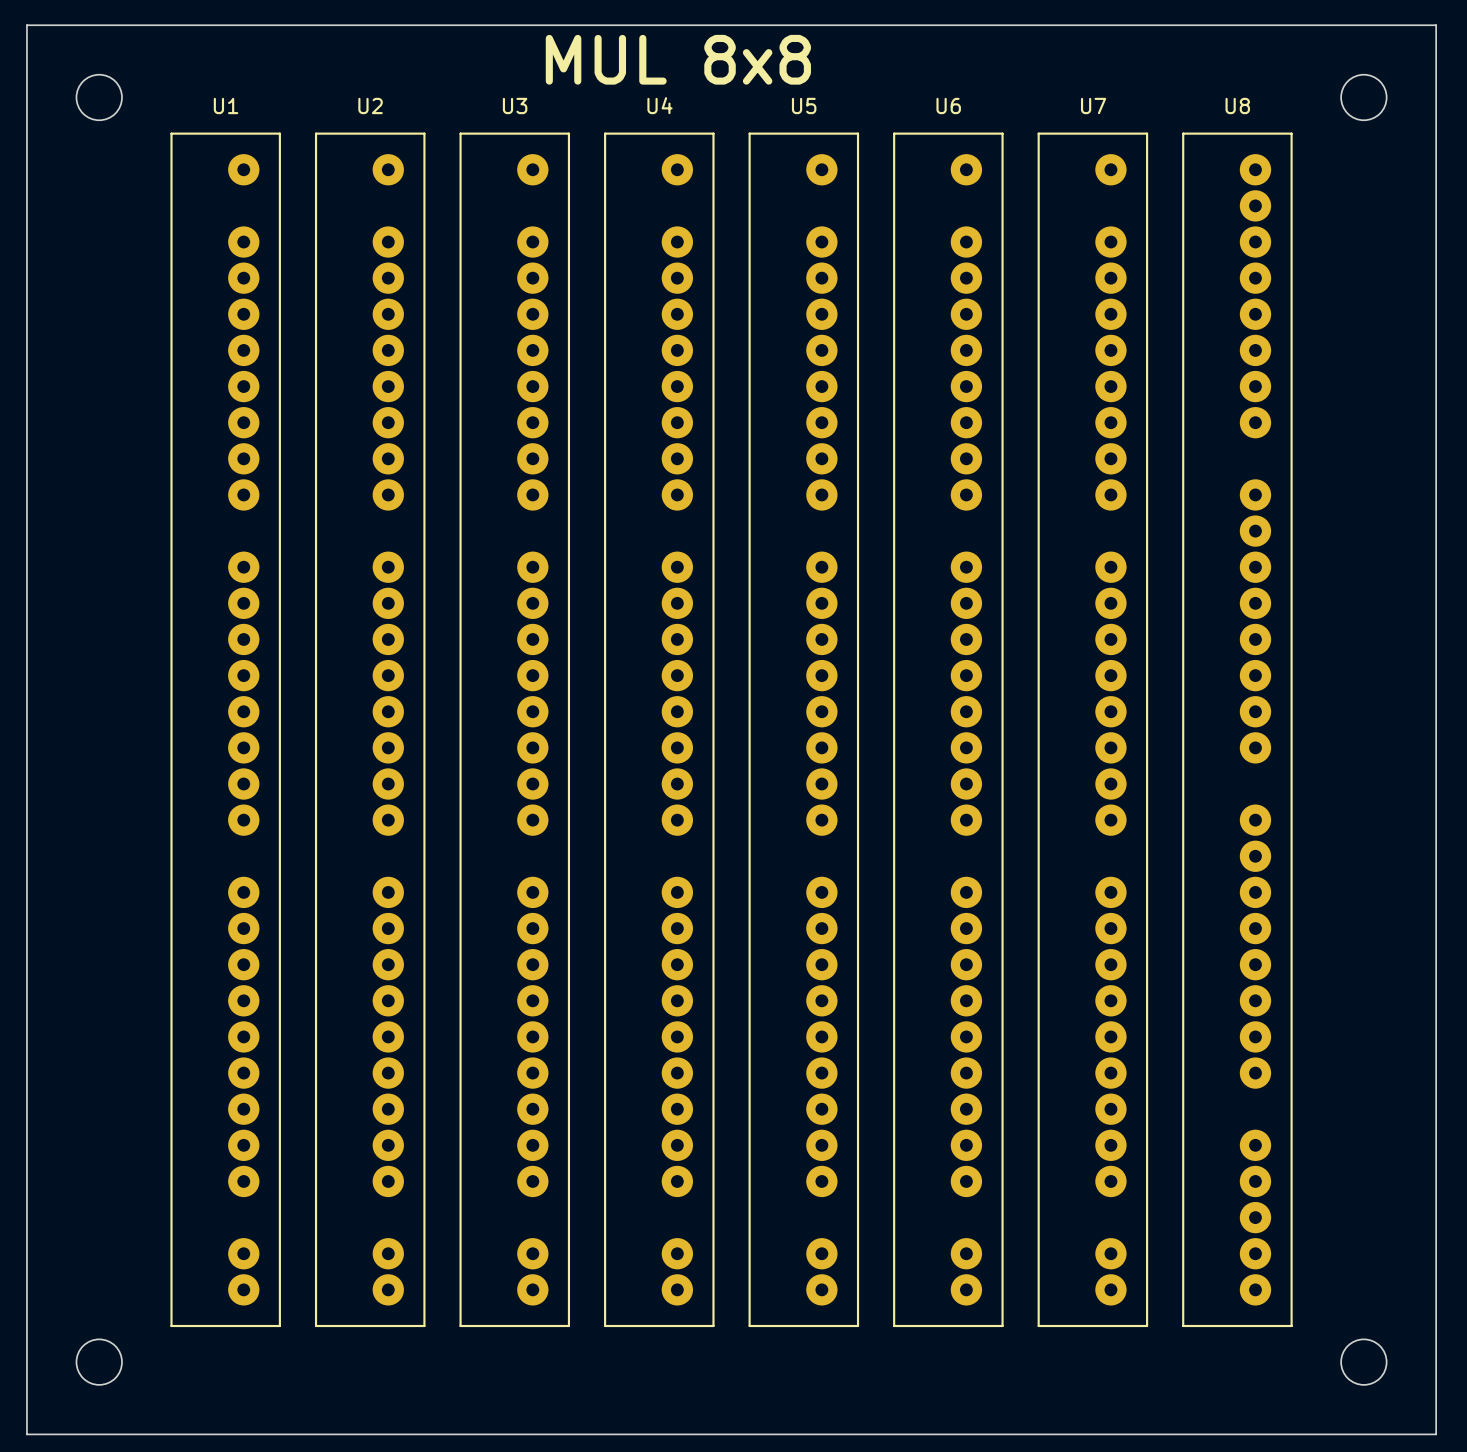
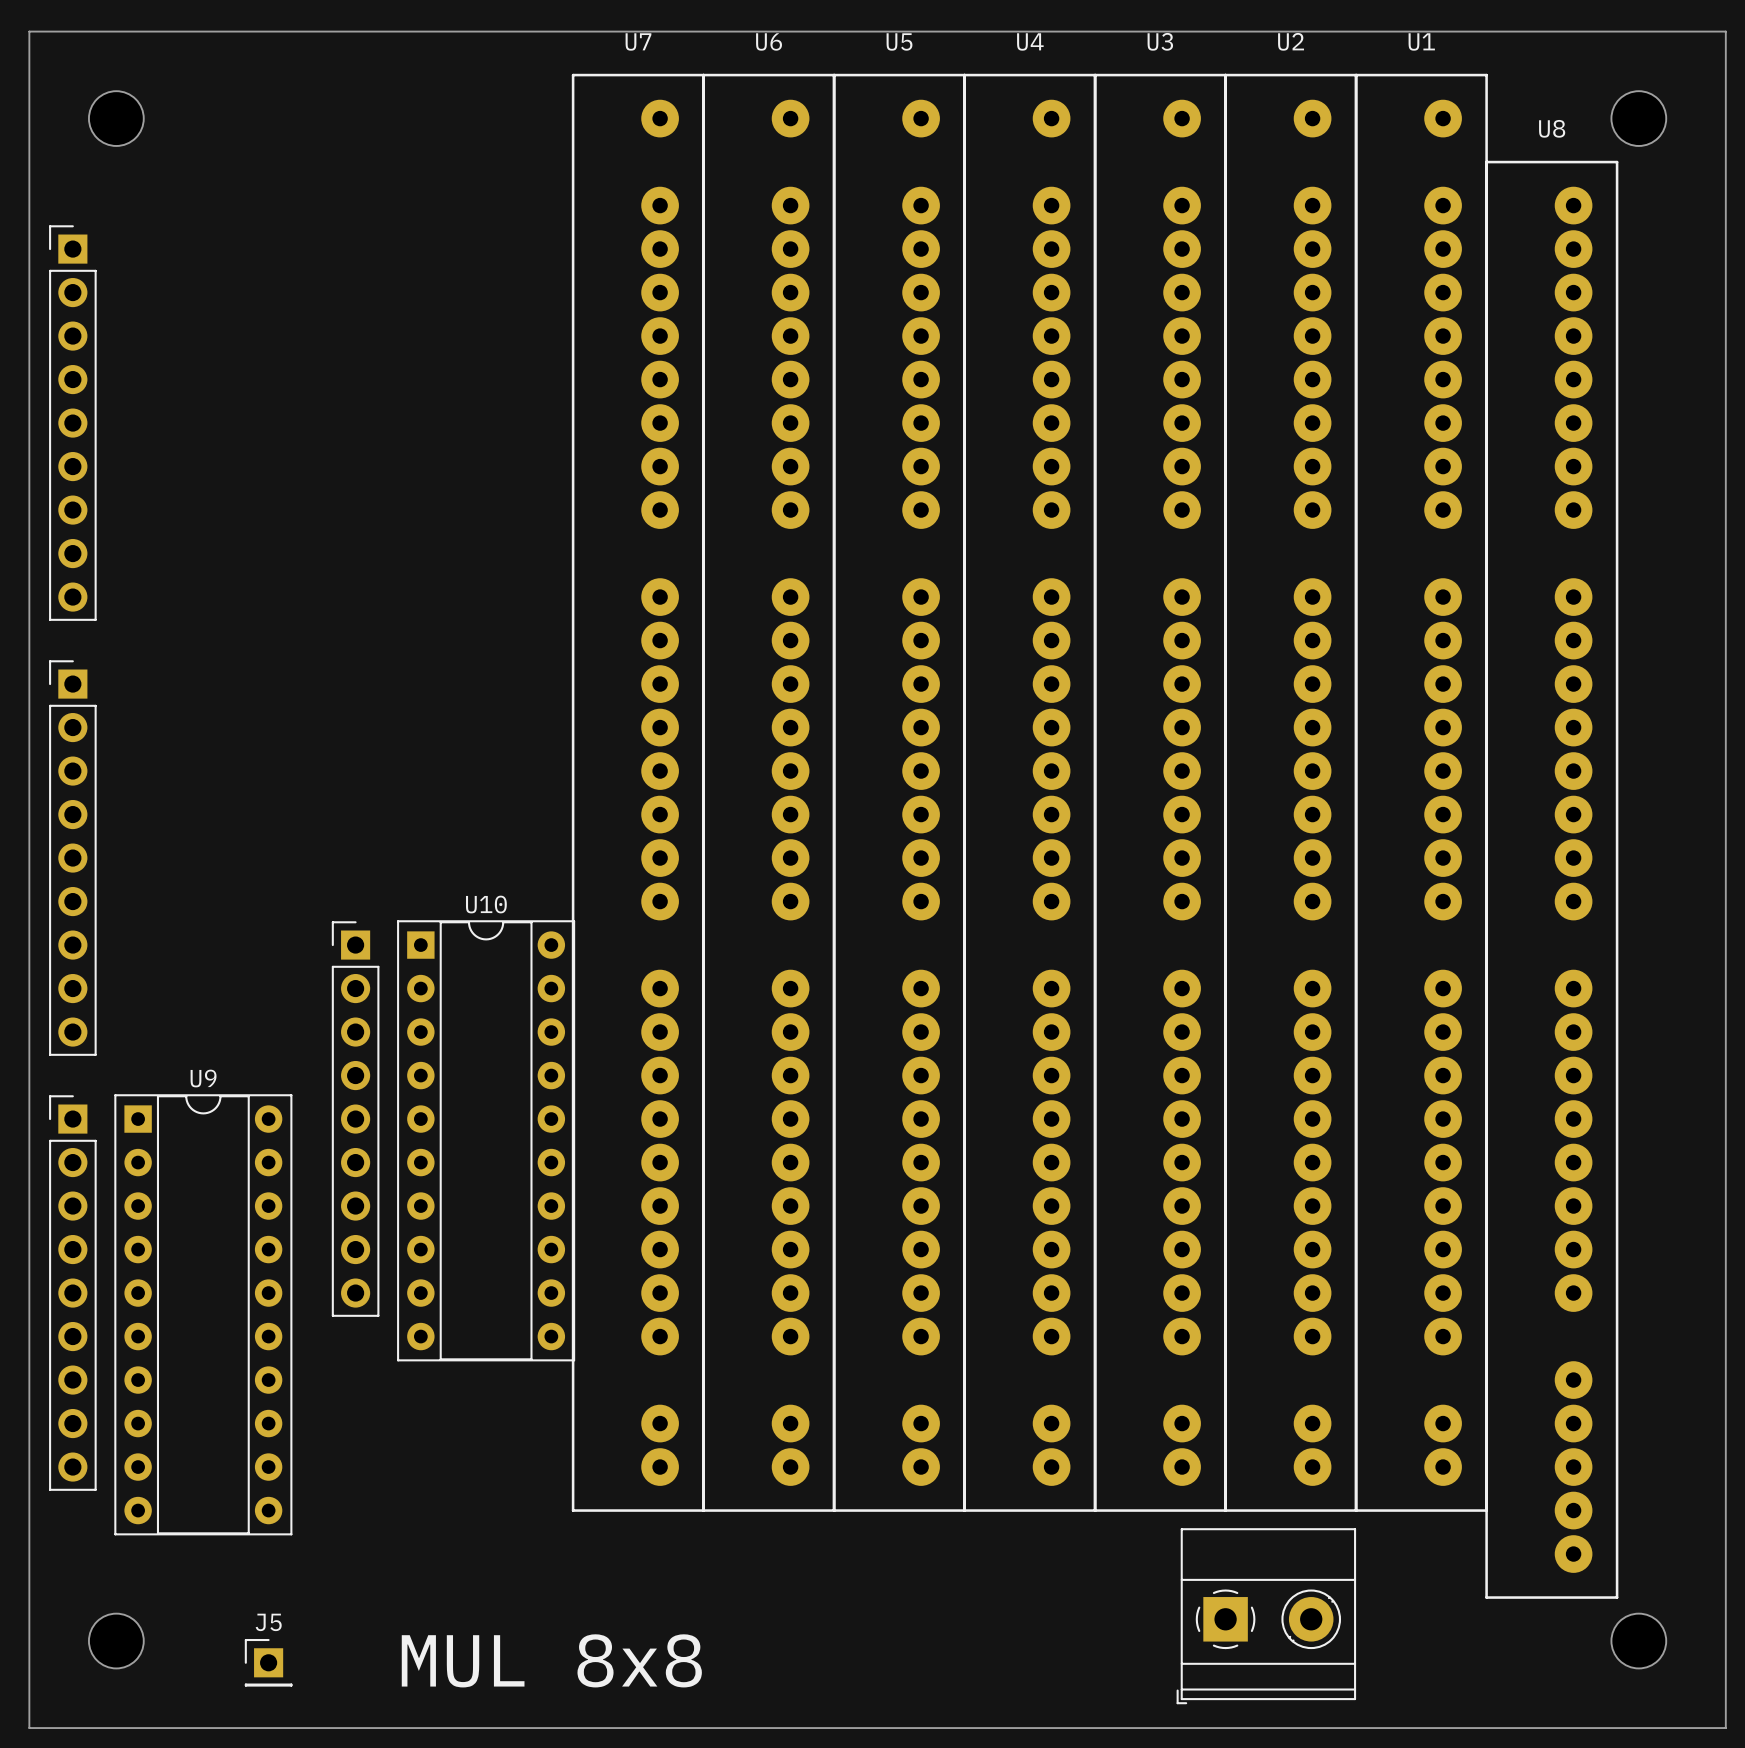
text: MUL 8x8 (678, 59) -> none
part: none -> (72, 423)
part: none -> (72, 858)
U1 position: (225, 729) -> (1421, 792)
U2 position: (370, 729) -> (1290, 792)
U3 position: (514, 729) -> (1160, 792)
U4 position: (659, 729) -> (1029, 792)
U5 position: (803, 729) -> (899, 792)
U6 position: (948, 729) -> (768, 792)
U7 position: (1092, 729) -> (638, 792)
U8 position: (1237, 729) -> (1551, 879)
part: none -> (355, 1119)
U10: none -> (486, 1140)
part: none -> (72, 1293)
U9: none -> (203, 1314)
part: none -> (1266, 1616)
text: none -> MUL 8x8 (551, 1660)
J5: none -> (268, 1662)

